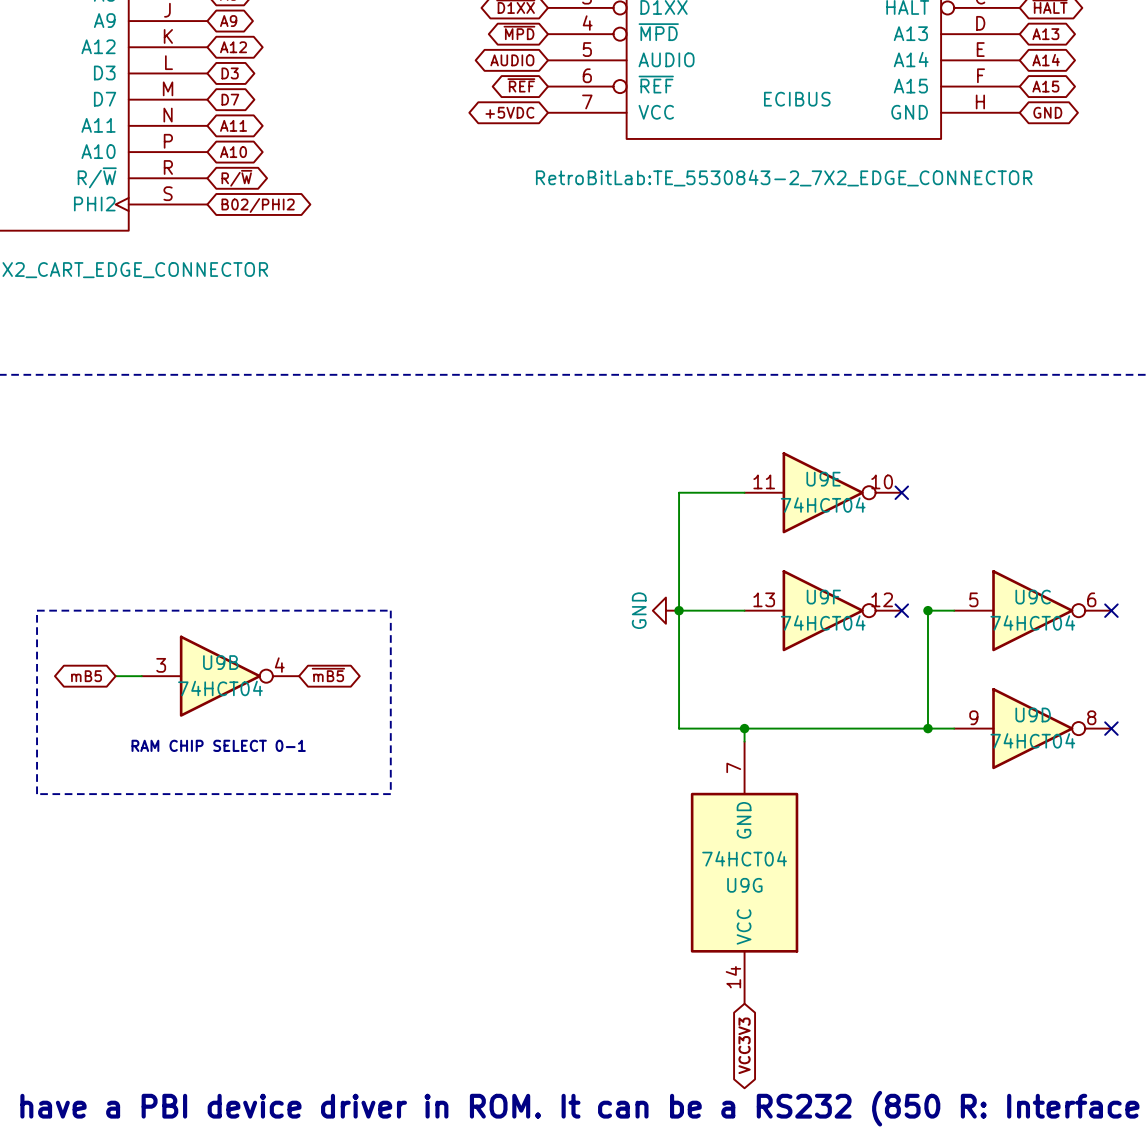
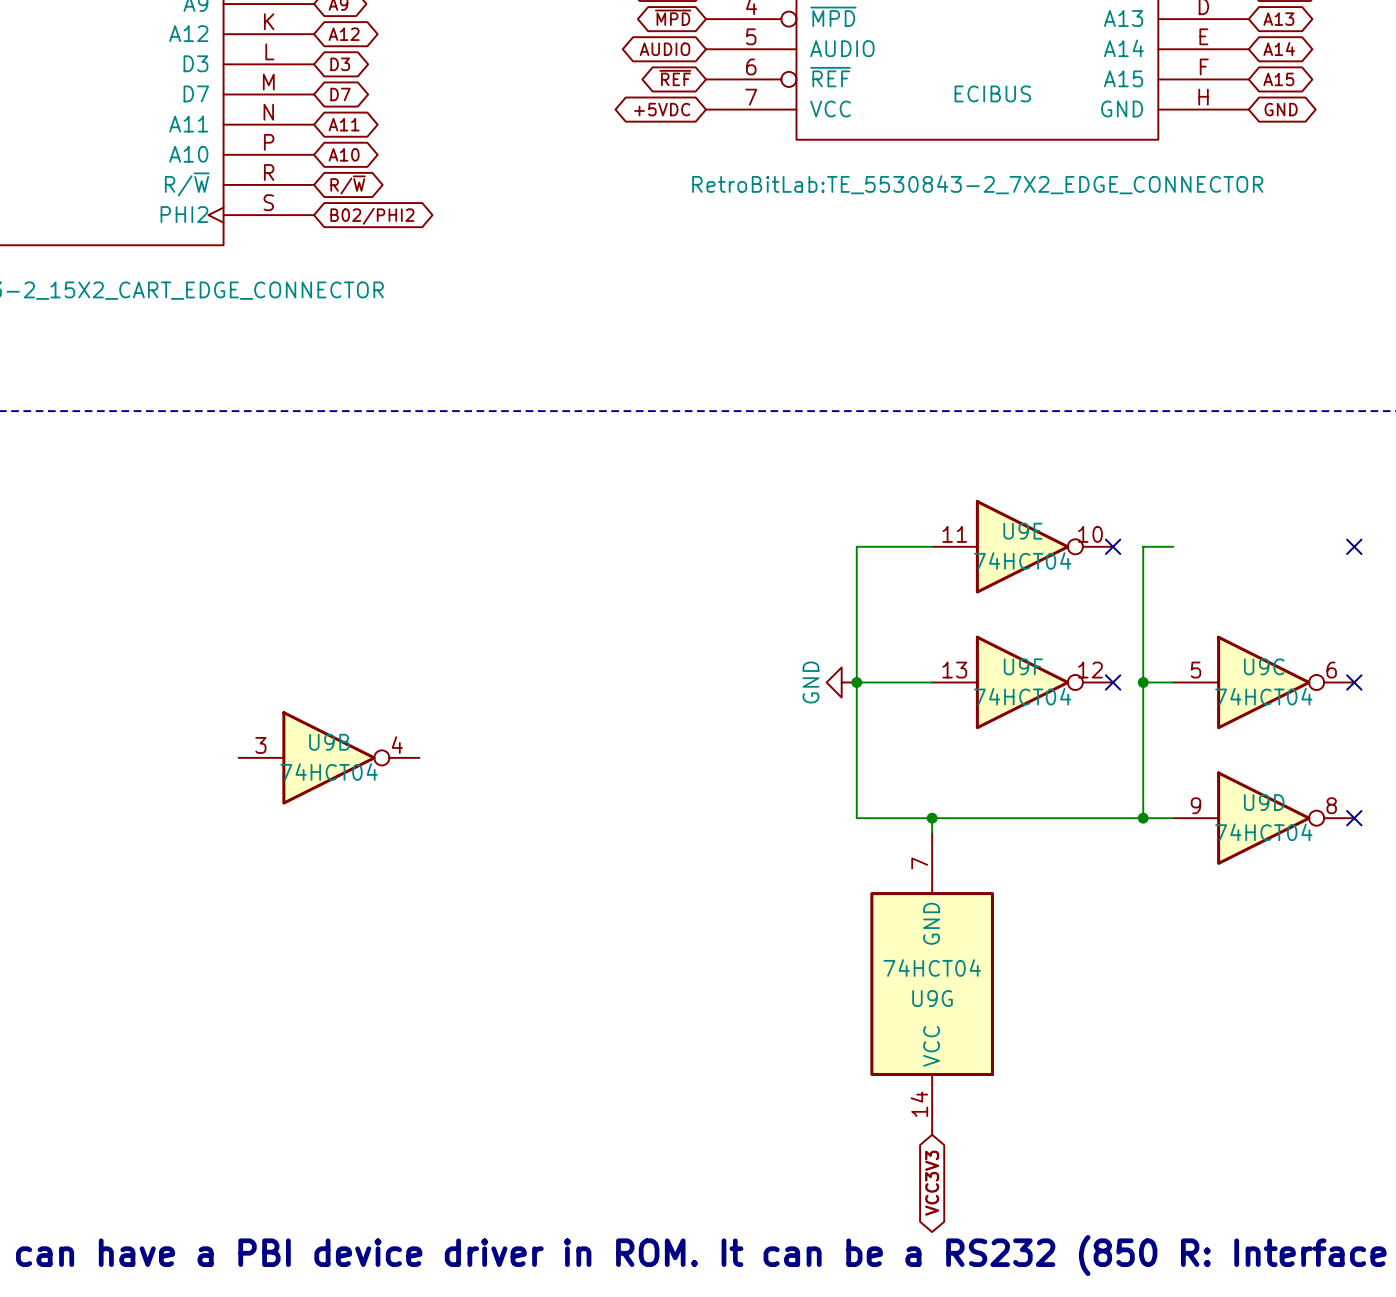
wire: none -> (1173, 546) (1143, 546) (1143, 682)
no-connect mark: none -> (1354, 546)
line: (37, 610) (37, 794) (390, 794) (390, 610) (37, 610) -> none
global label: ~{mB5} (328, 675) -> none
global label: mB5 (86, 676) -> none
wire: (115, 676) (141, 676) -> none
text: RAM CHIP SELECT 0-1 (218, 745) -> none

